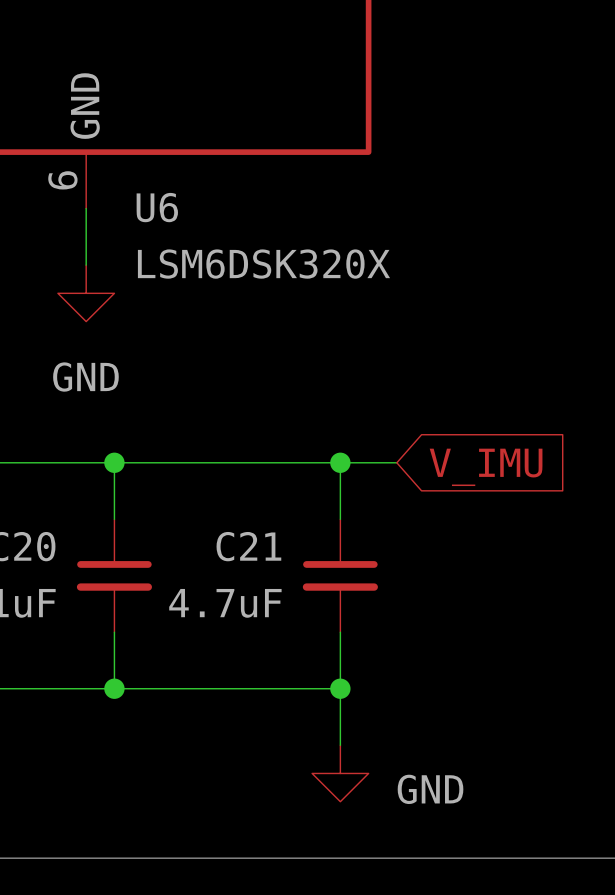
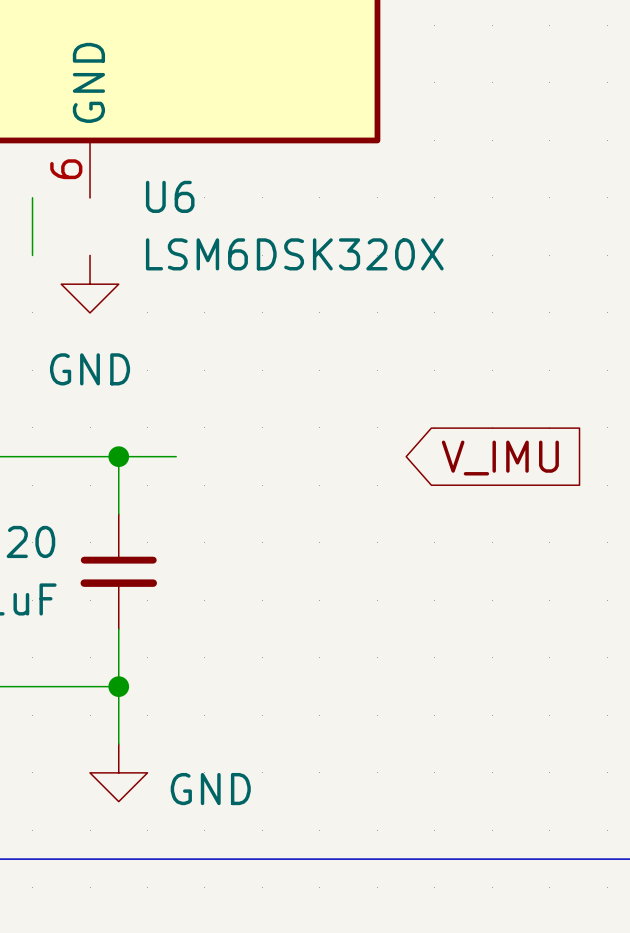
wire: (86, 208) (86, 265) -> (32, 197) (32, 255)
wire: (170, 462) (396, 462) -> none
wire: (340, 462) (340, 519) -> none
junction: (340, 462) -> none
C21: 4.7uF (340, 575) -> none
wire: (340, 632) (340, 745) -> none
wire: (114, 688) (340, 688) -> (118, 686) (118, 744)
junction: (340, 688) -> none
power symbol position: GND (340, 773) -> GND (118, 772)

